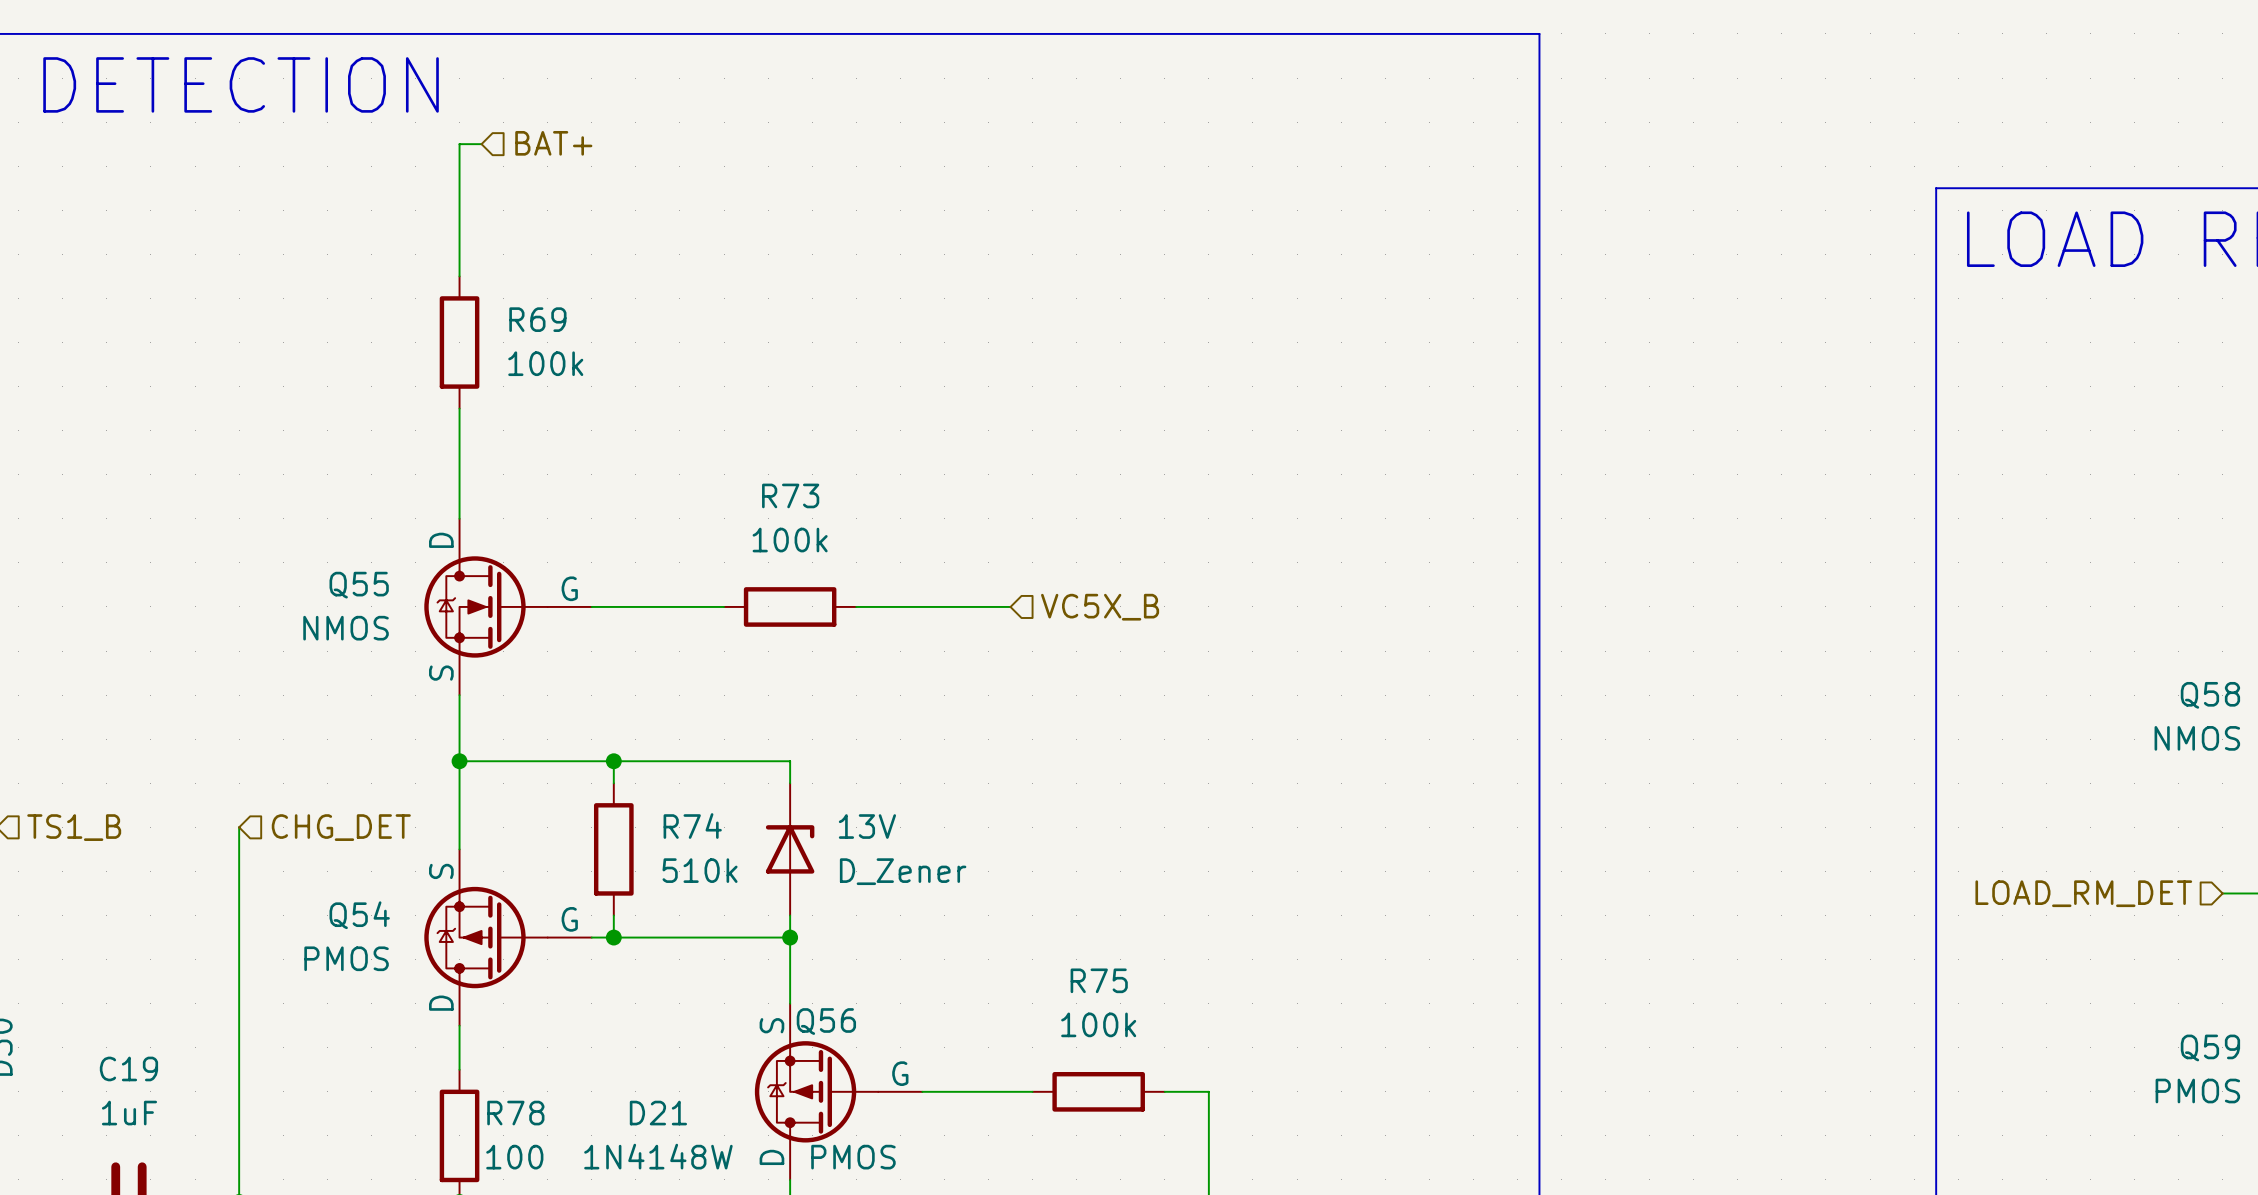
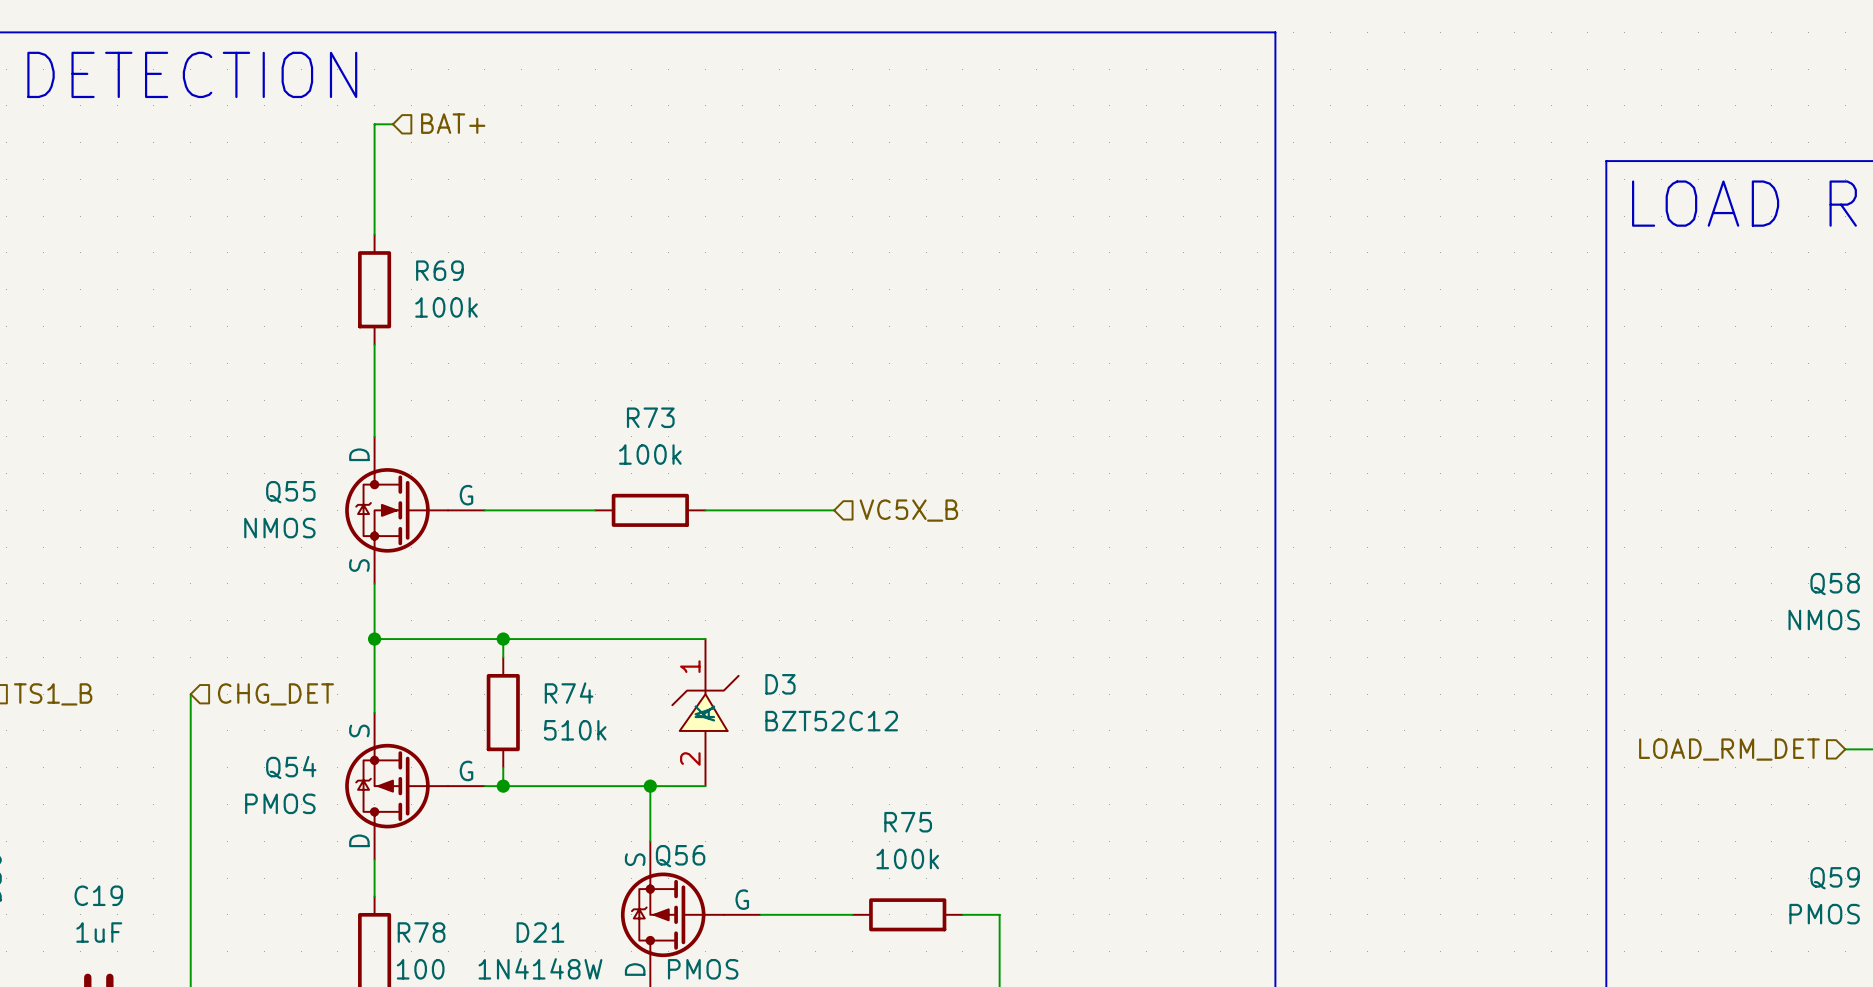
wire: (790, 761) (790, 783) -> (650, 639) (705, 639)
13V: D_Zener (790, 849) -> none
D3: none -> BZT52C12 (705, 712)
wire: (790, 915) (790, 937) -> (705, 786) (650, 786)

